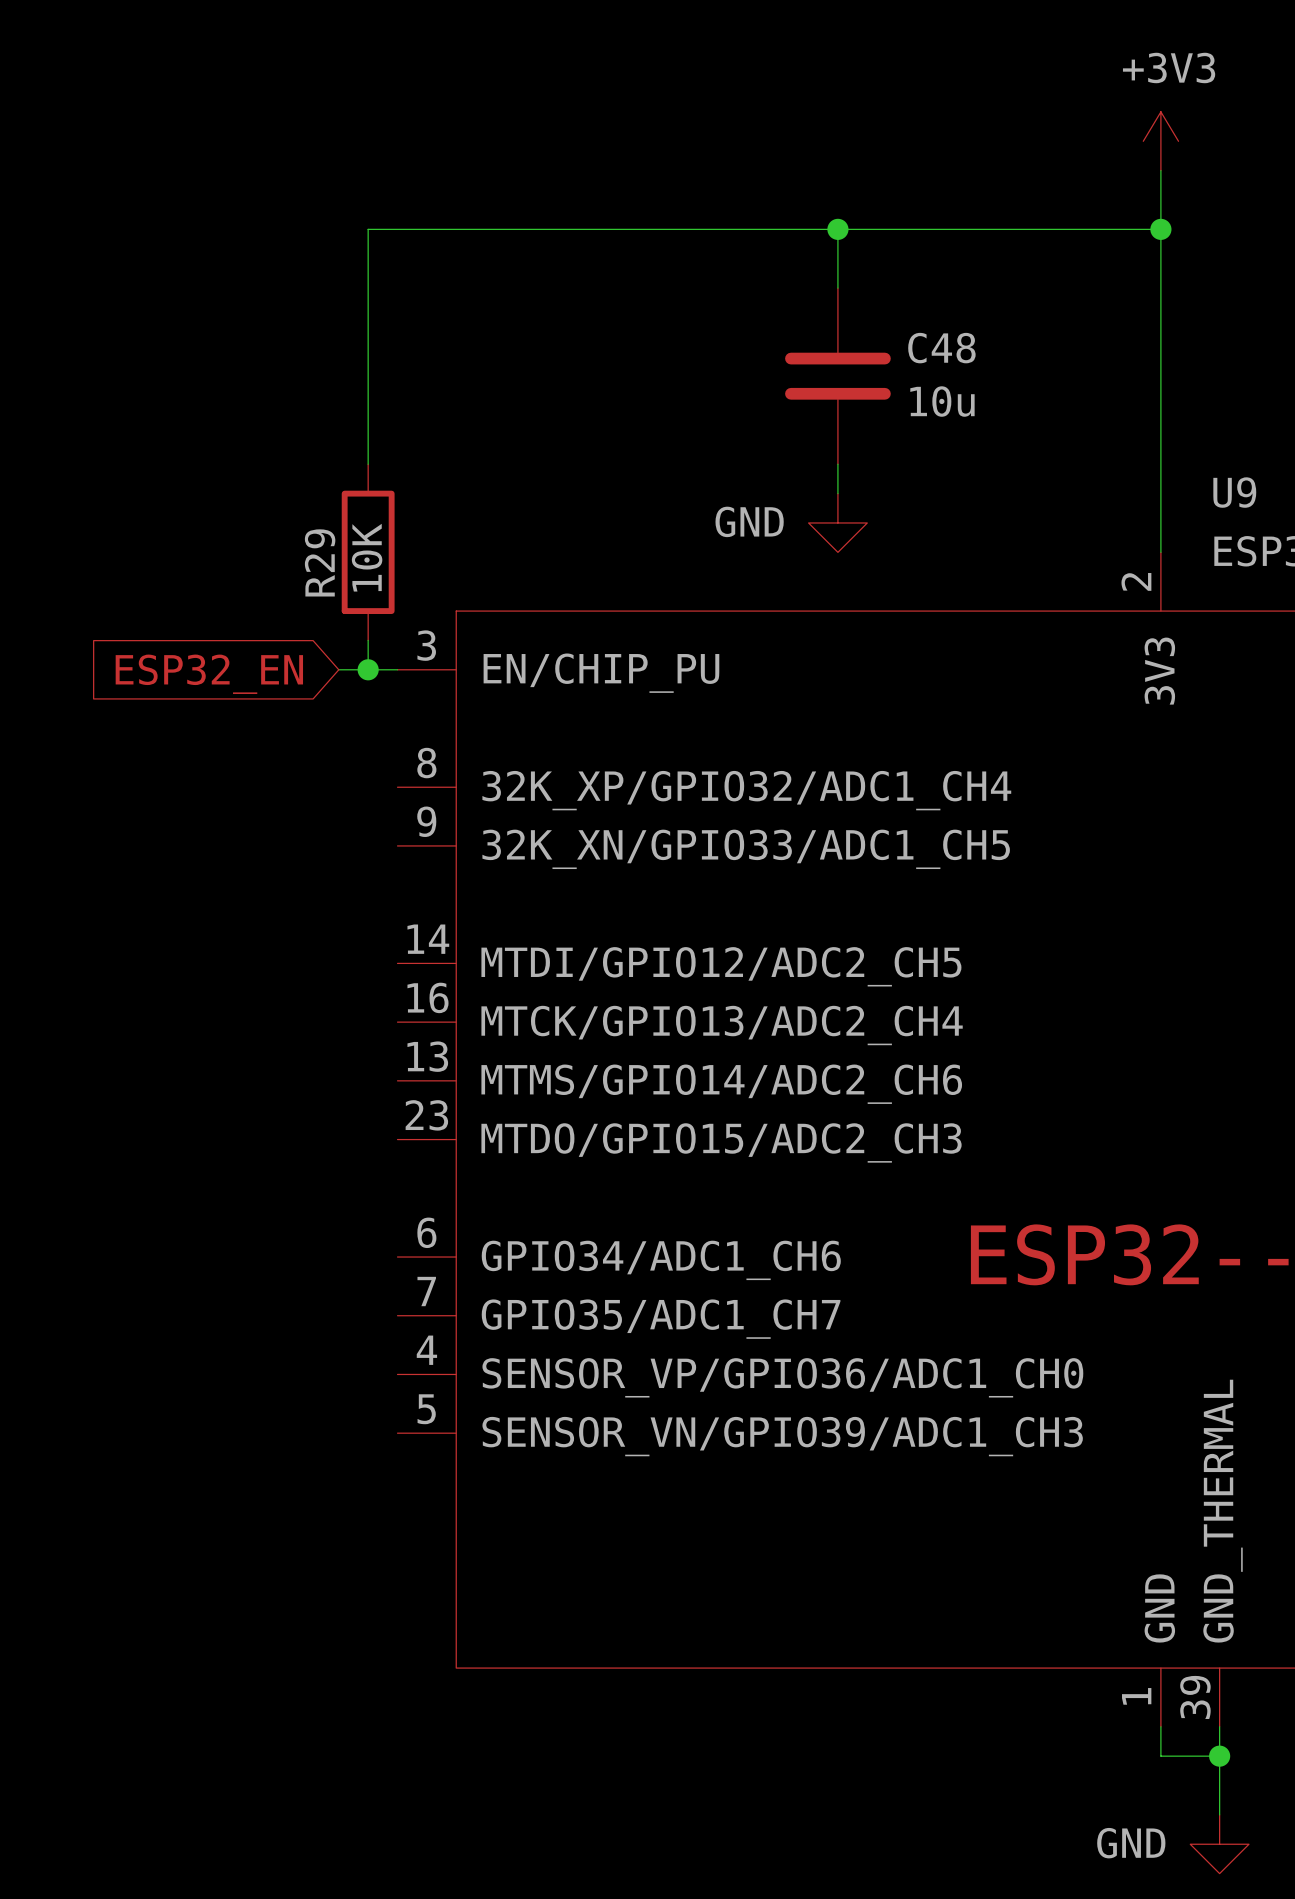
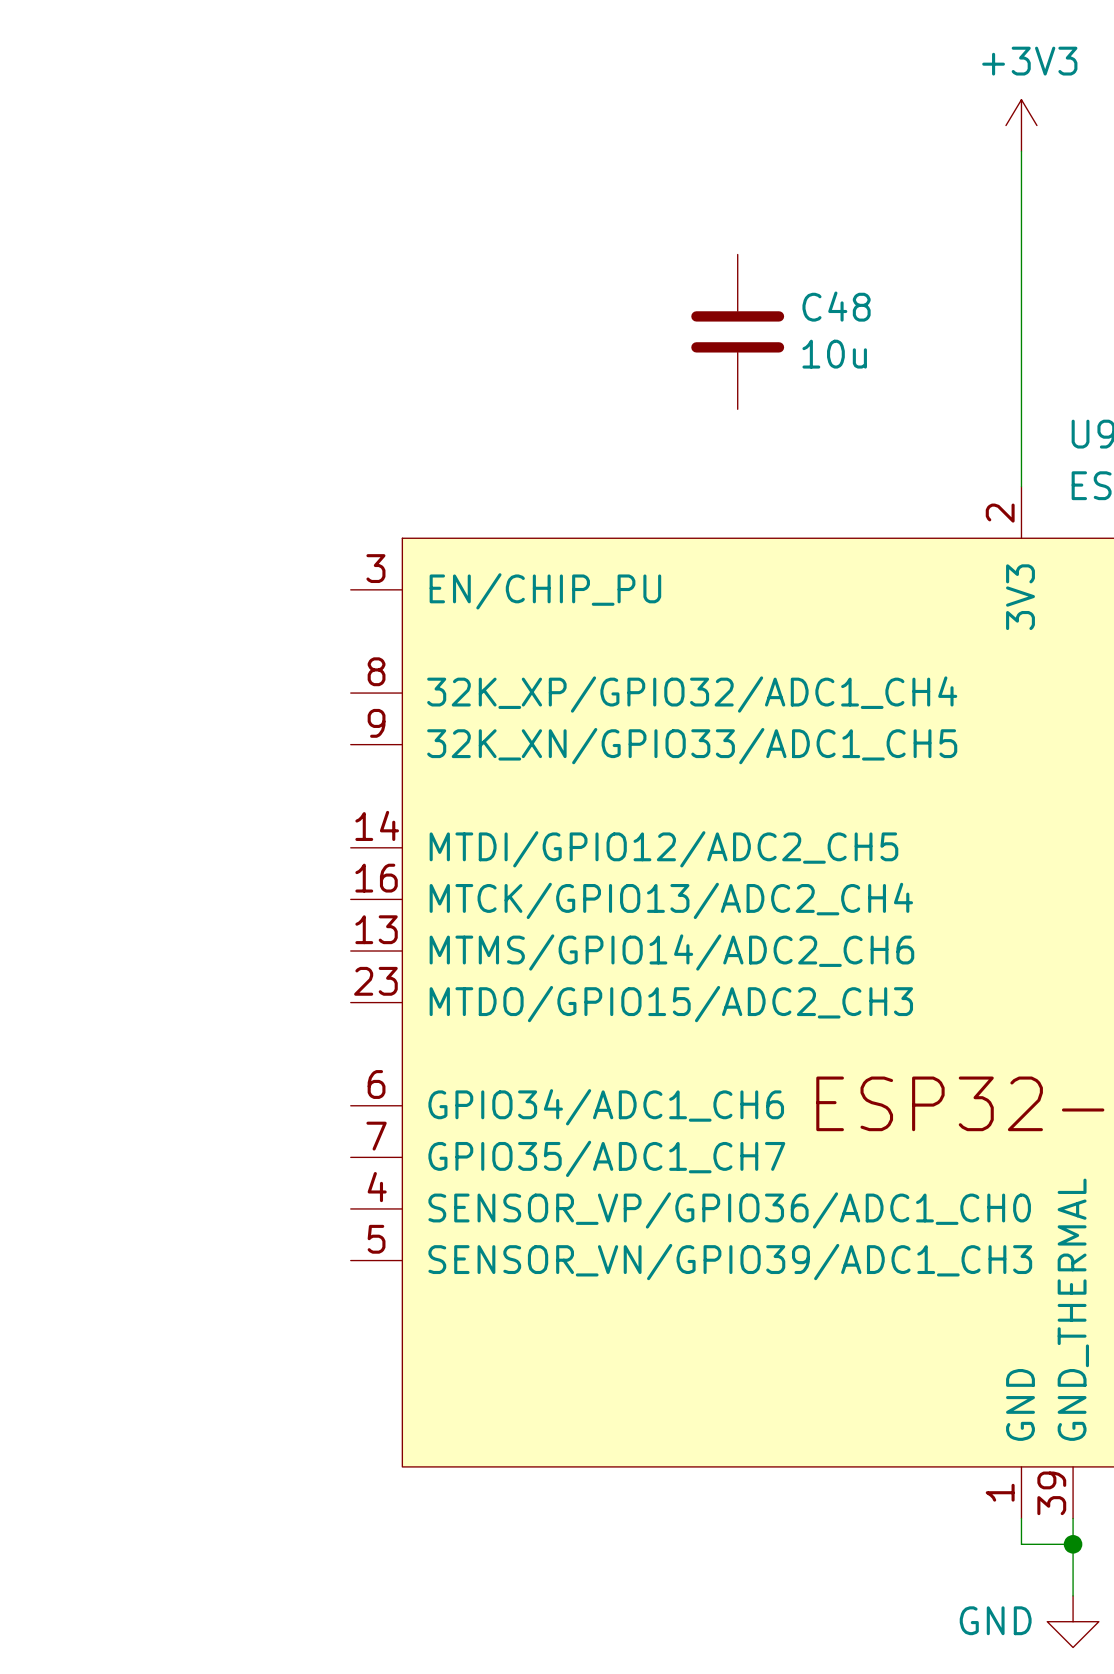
wire: (837, 229) (837, 288) -> none
junction: (837, 229) -> none
wire: (1160, 229) (368, 229) (368, 464) -> none
junction: (1160, 229) -> none
wire: (837, 464) (837, 493) -> none
power symbol: GND (837, 522) -> none
R29: 10K (368, 552) -> none
wire: (368, 640) (368, 669) -> none
wire: (338, 669) (397, 669) -> none
junction: (368, 669) -> none
global label: ESP32_EN (209, 674) -> none

